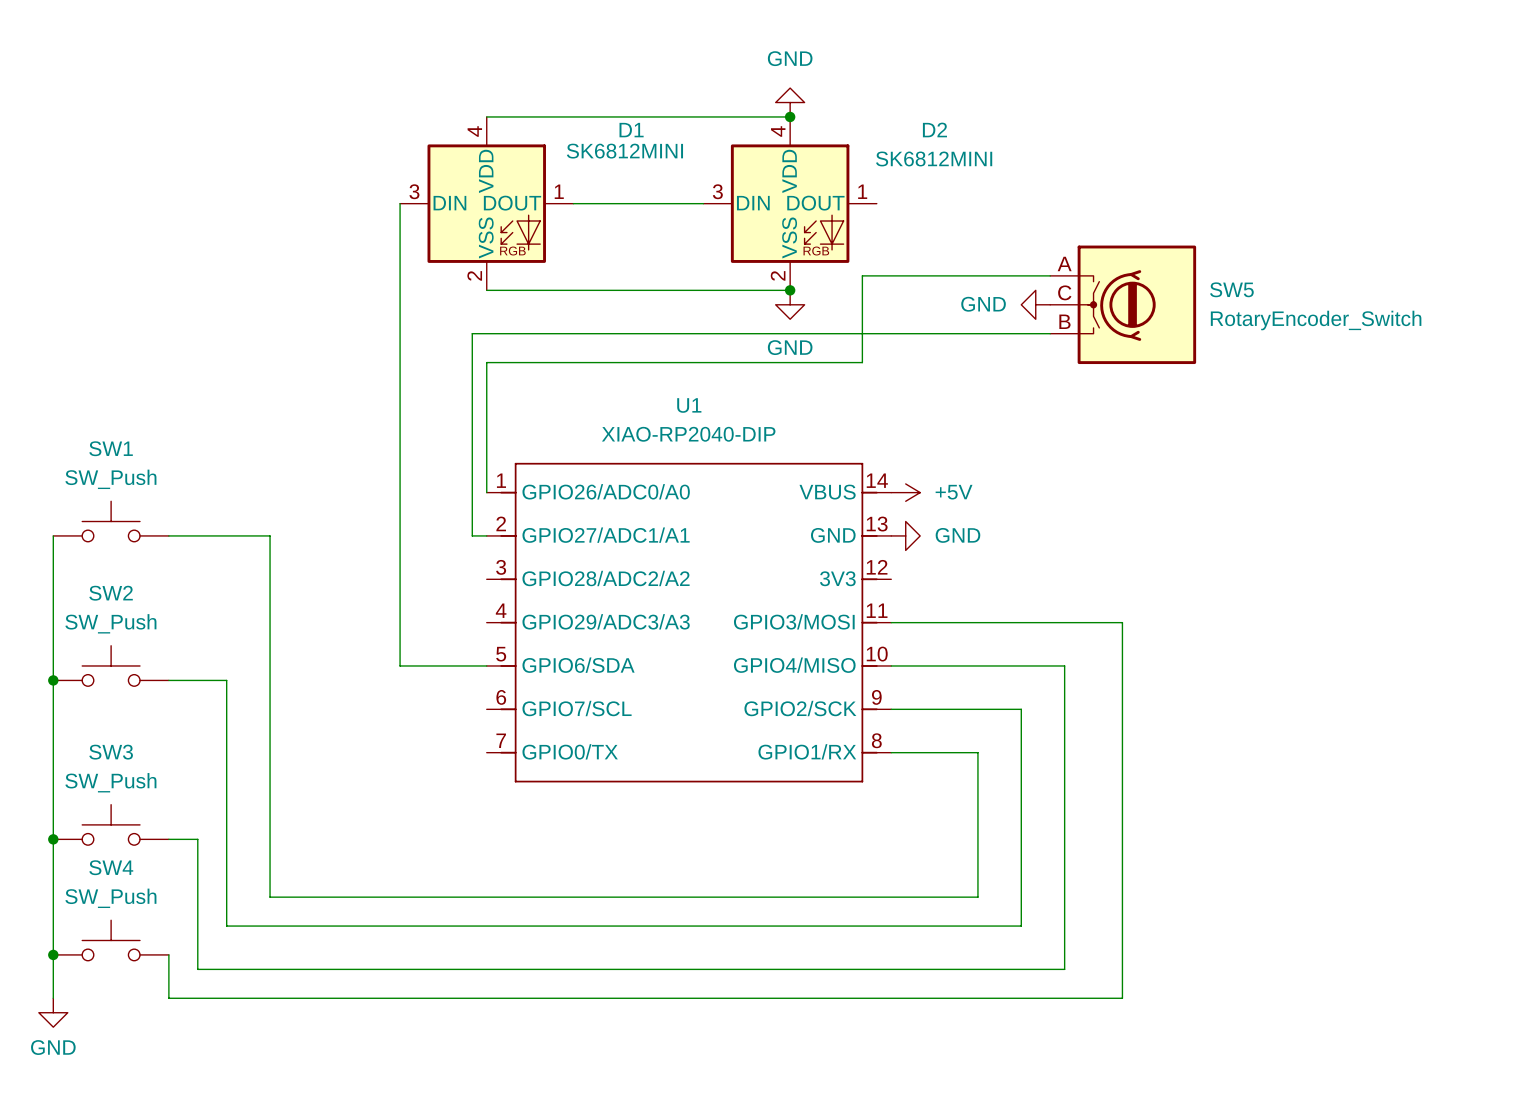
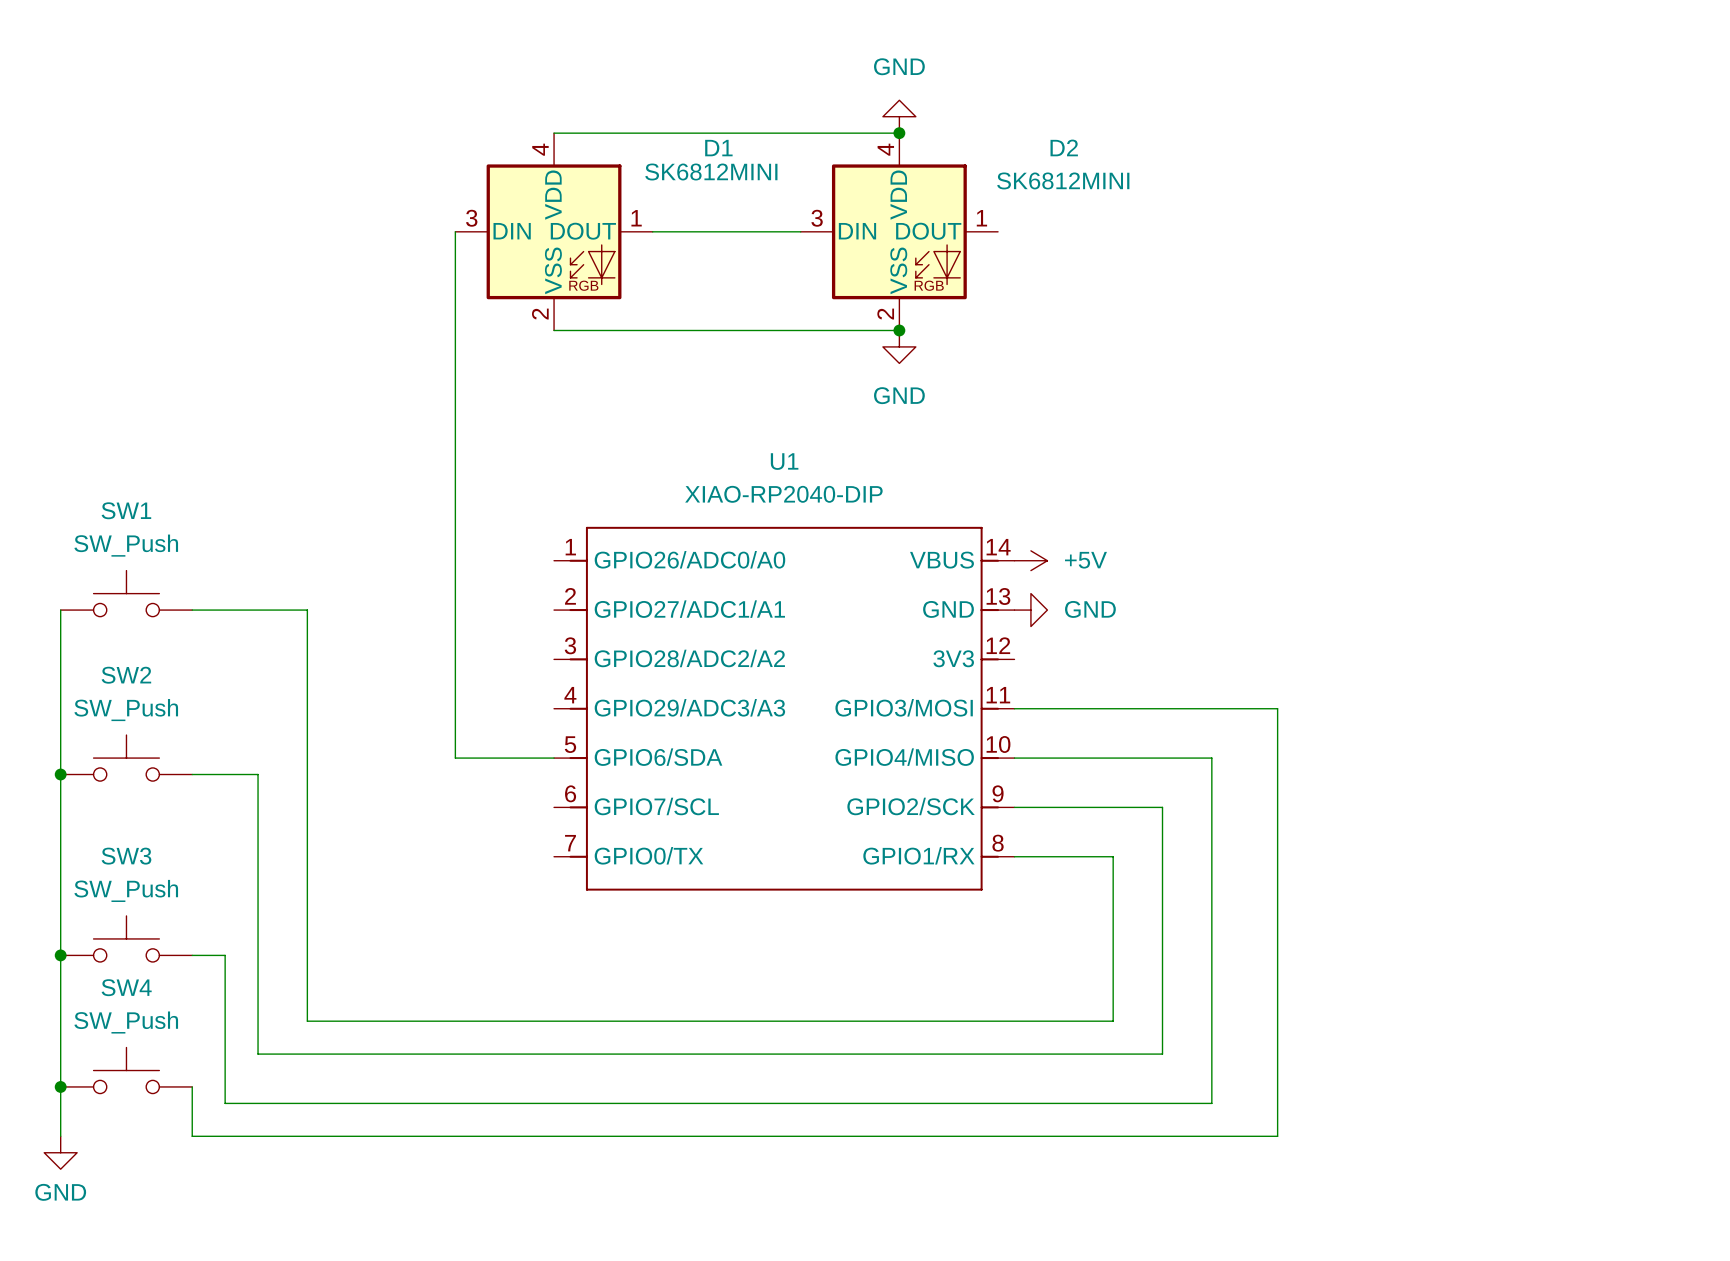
wire: (1050, 275) (862, 275) (862, 362) (486, 362) (486, 492) -> none
power symbol: GND (1035, 304) -> none
SW5: RotaryEncoder_Switch (1123, 304) -> none
wire: (1050, 333) (472, 333) (472, 535) (486, 535) -> none

